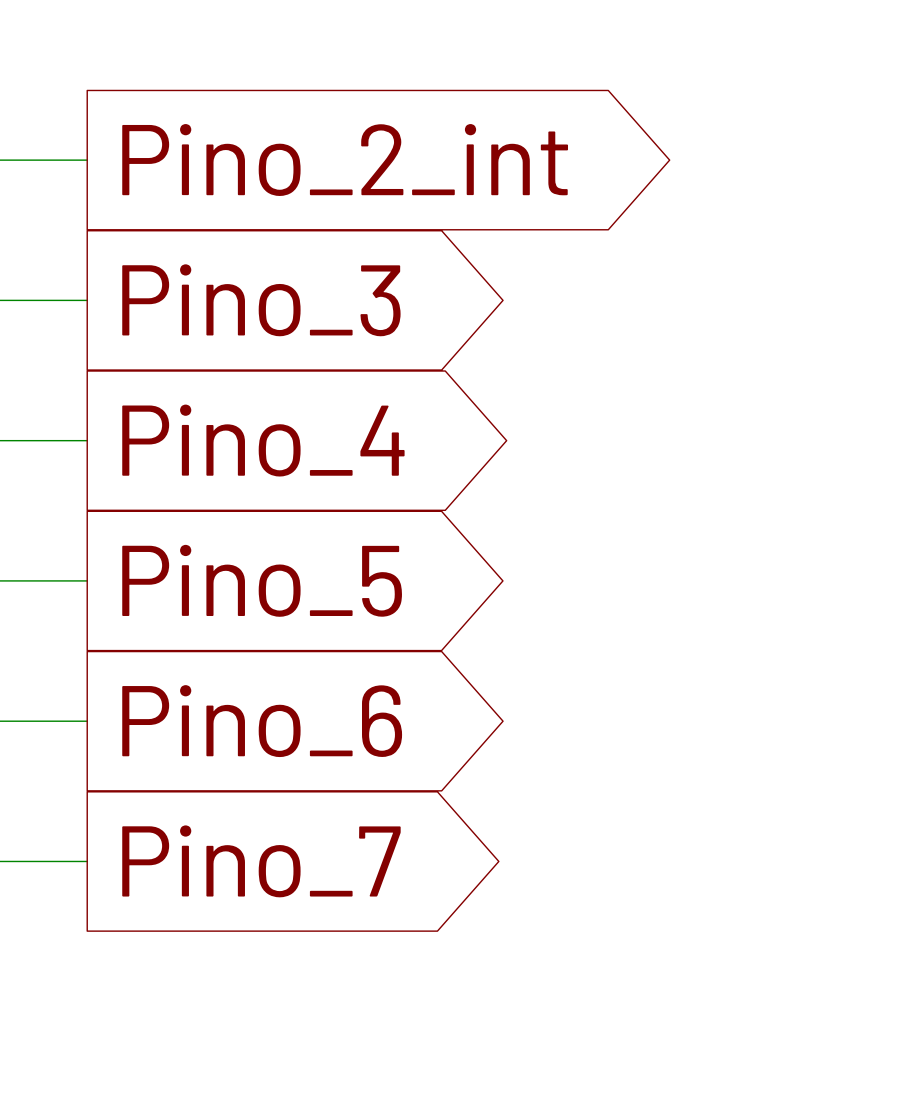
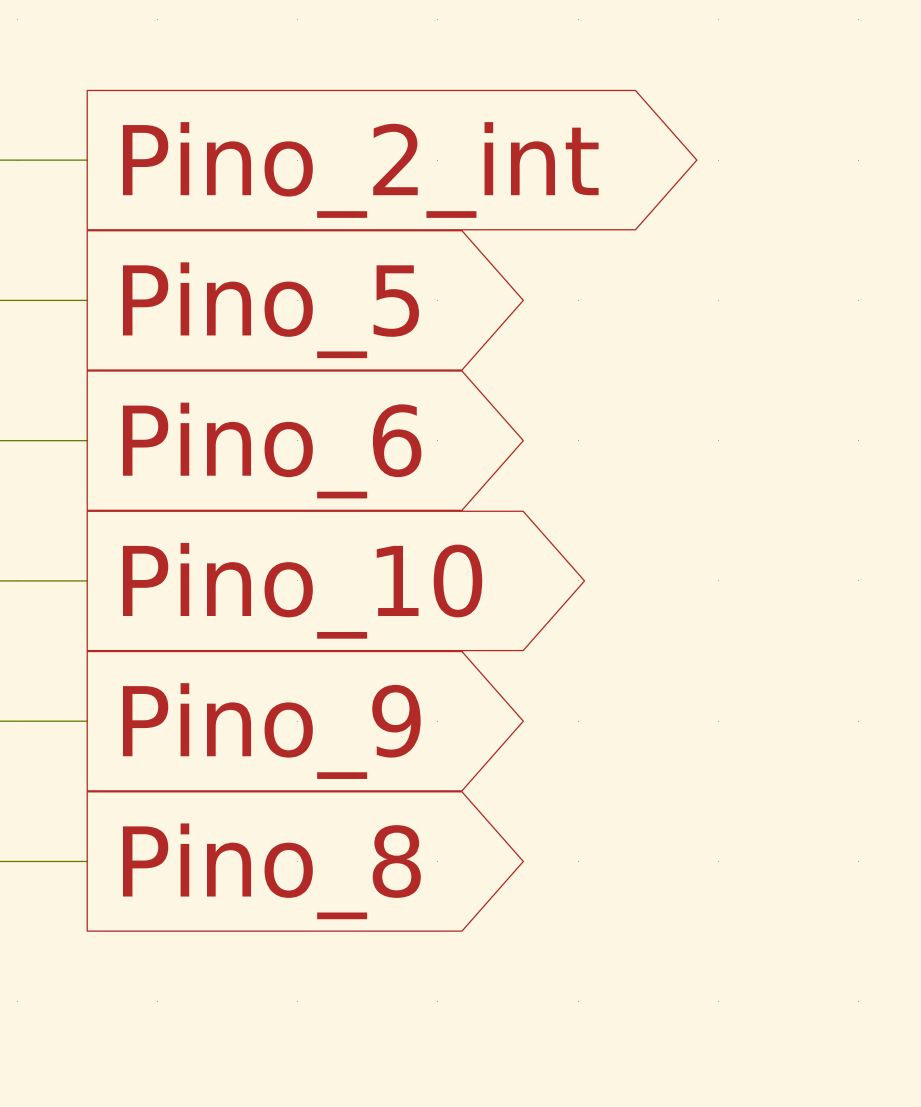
global label: Pino_3 (261, 300) -> Pino_5 (270, 310)
global label: Pino_4 (263, 440) -> Pino_6 (272, 450)
global label: Pino_5 (262, 580) -> Pino_10 (302, 590)
global label: Pino_6 (262, 721) -> Pino_9 (271, 731)
global label: Pino_7 (261, 861) -> Pino_8 (271, 871)

